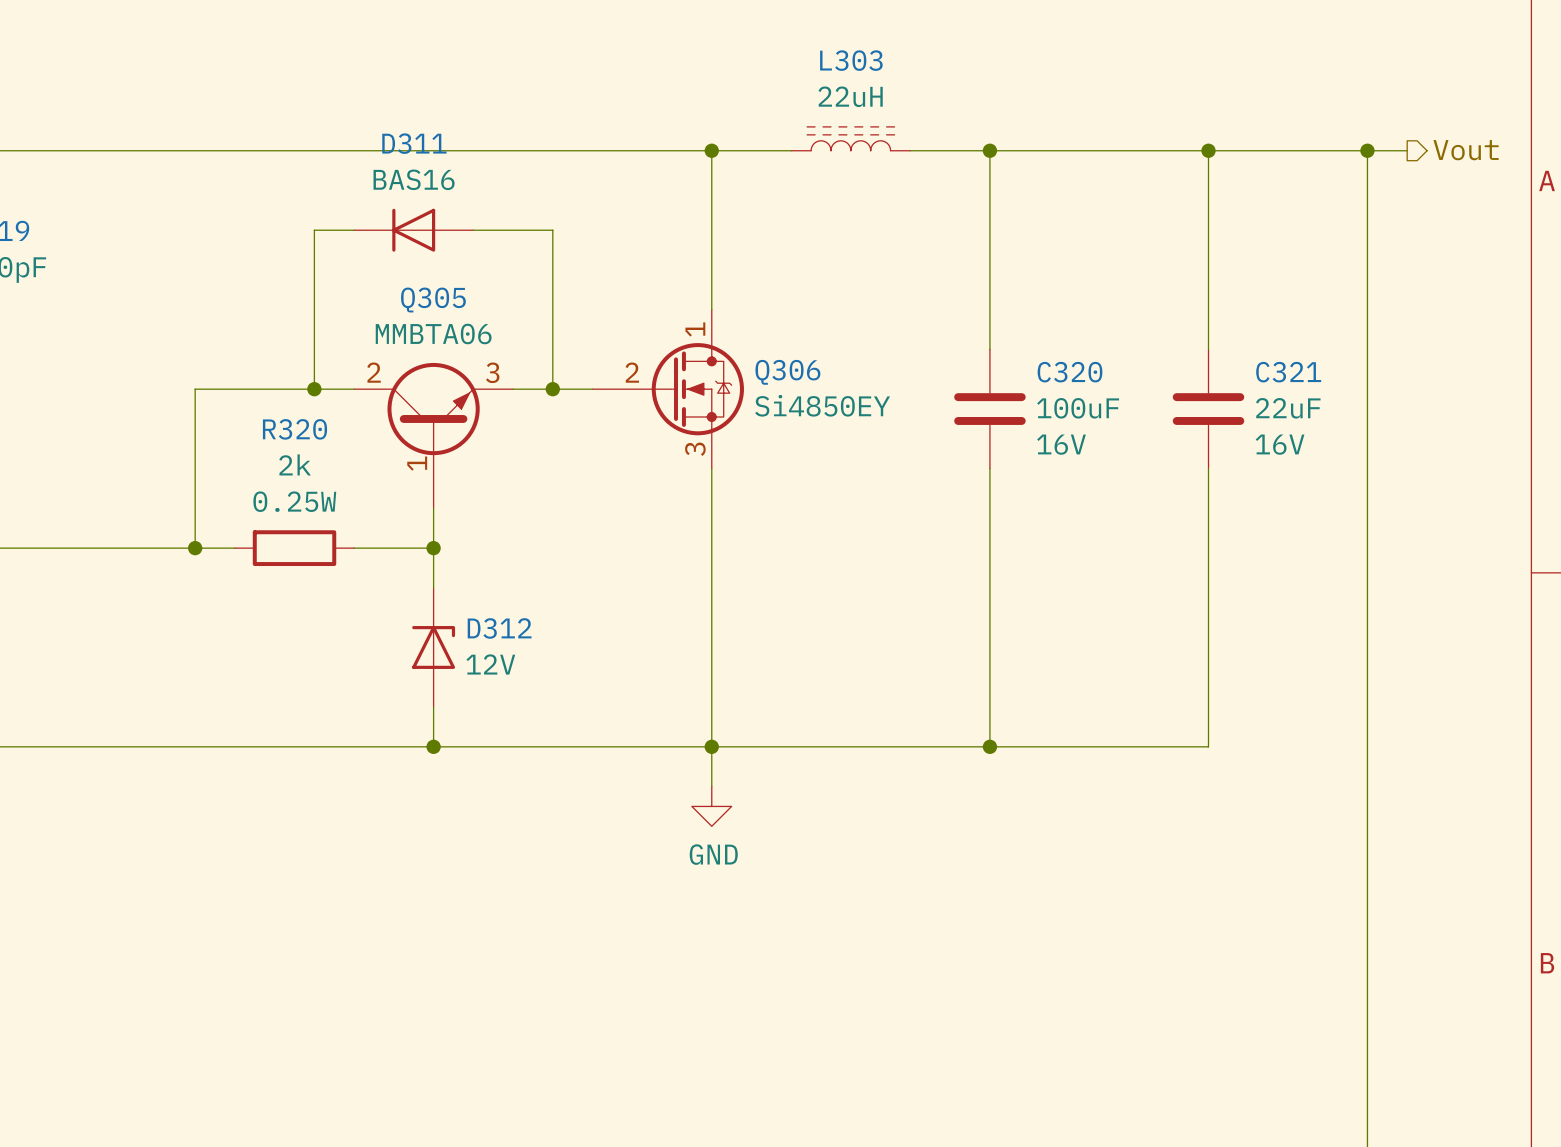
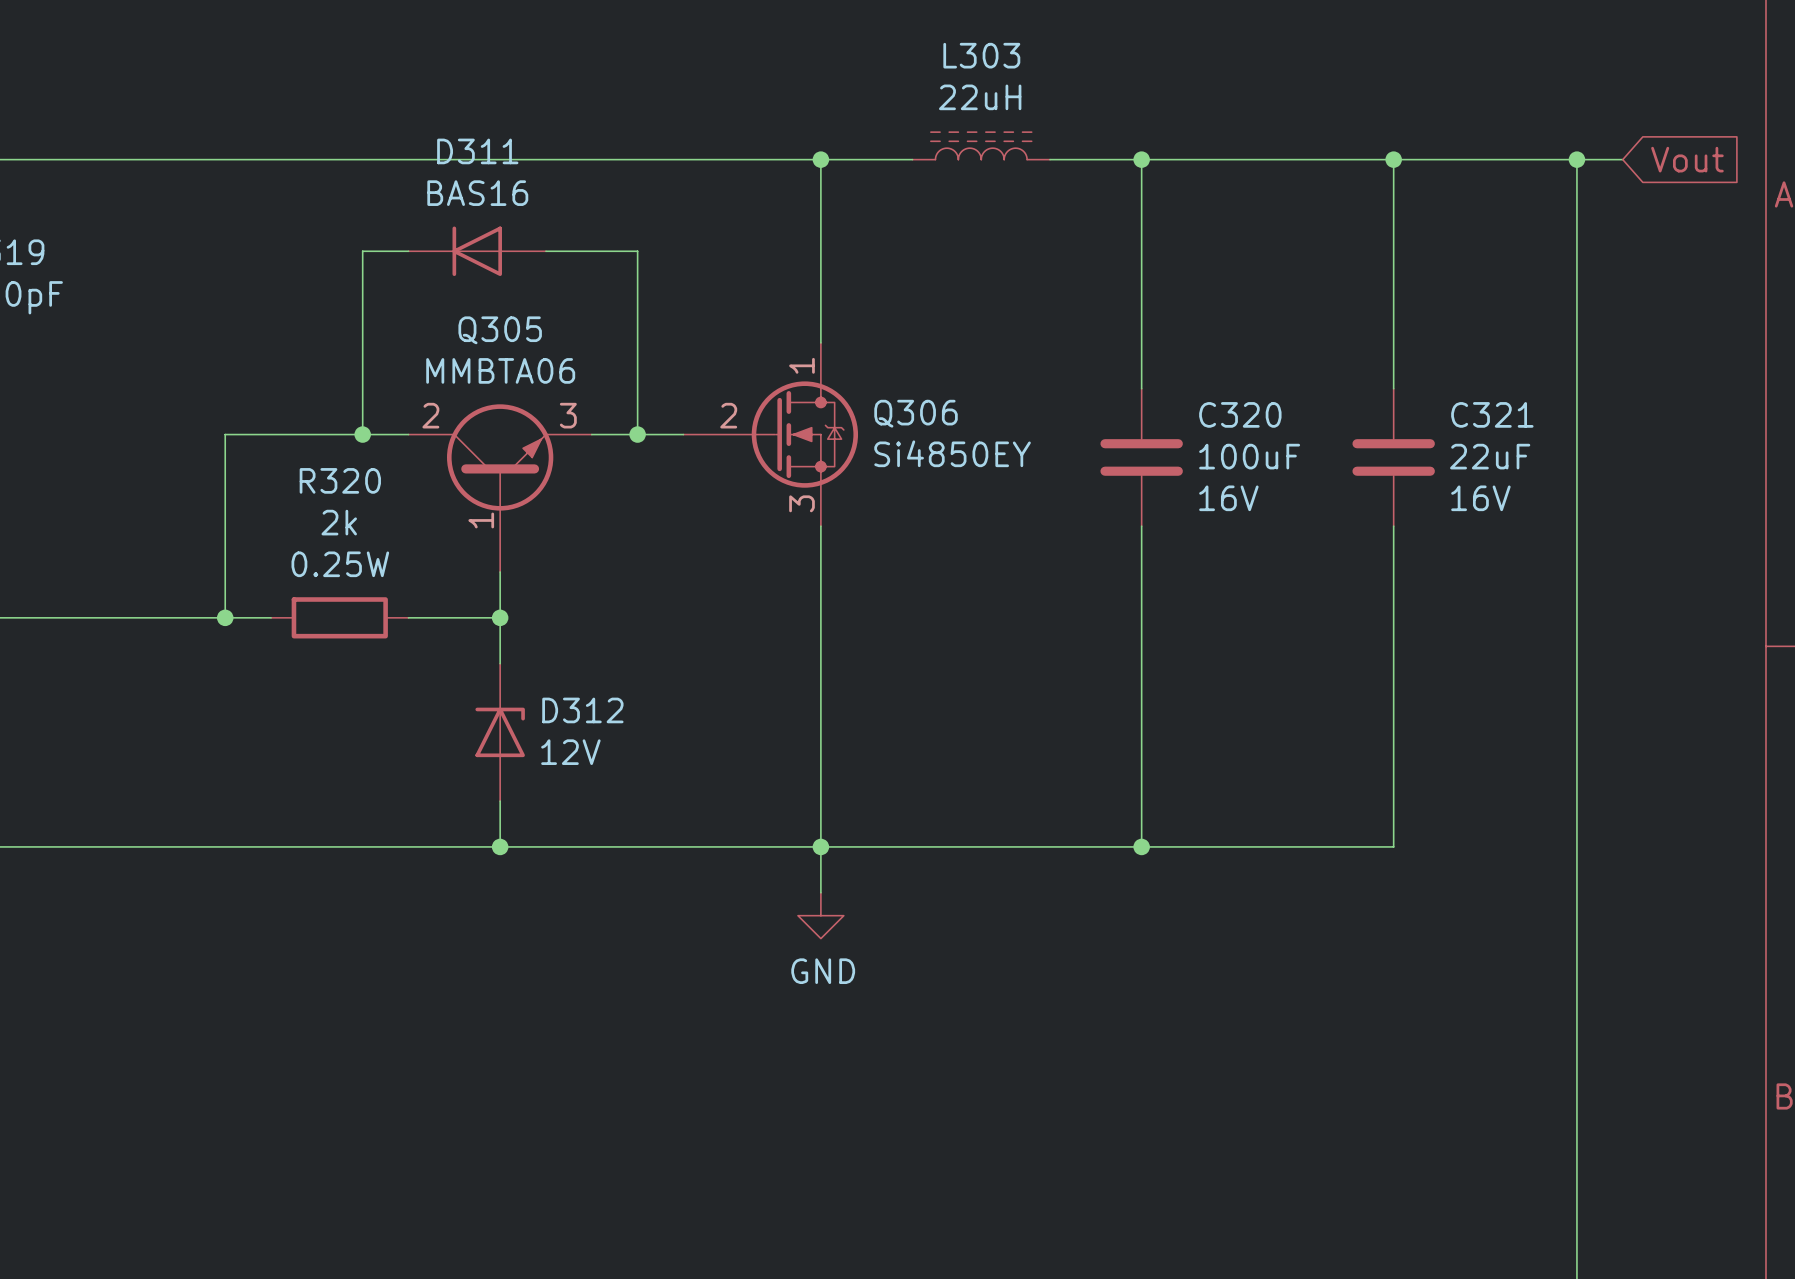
global label: none -> Vout (1687, 159)
hierarchical label: Vout (1466, 150) -> none

